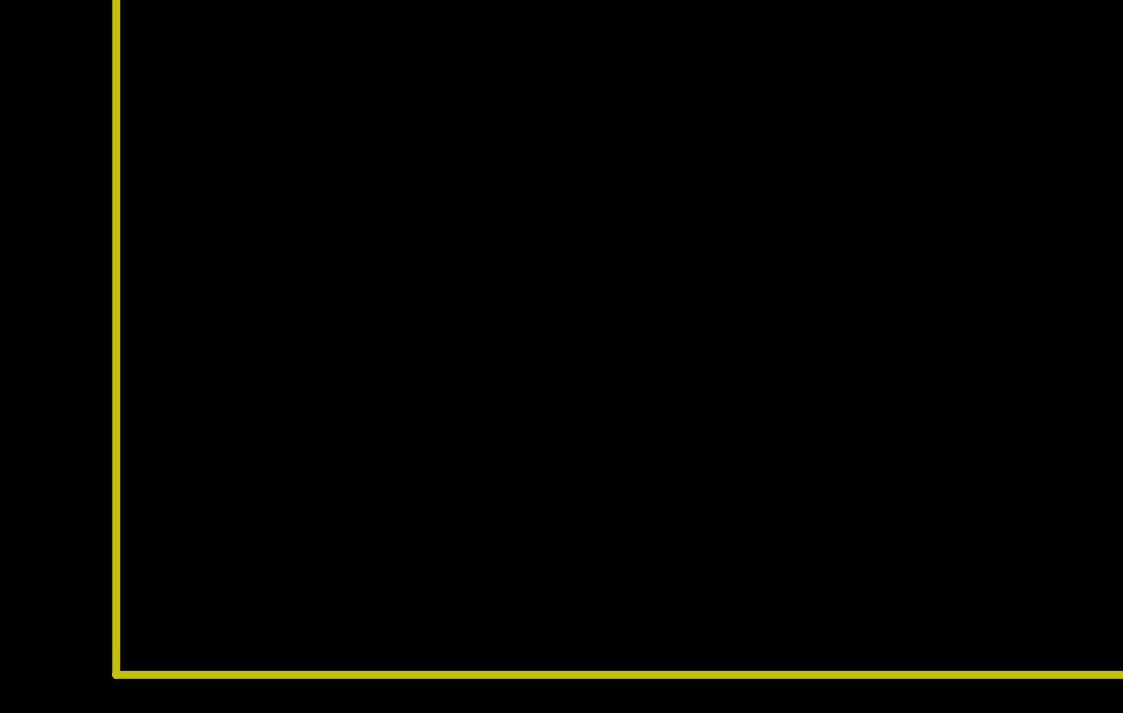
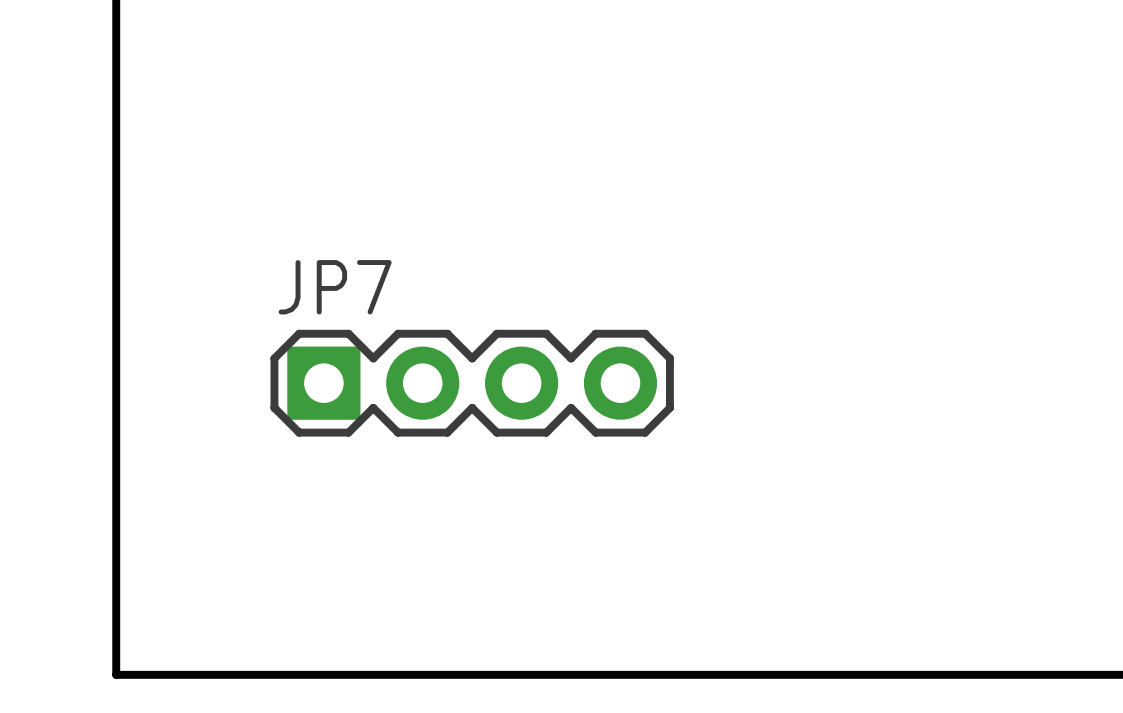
JP7: none -> (472, 383)

